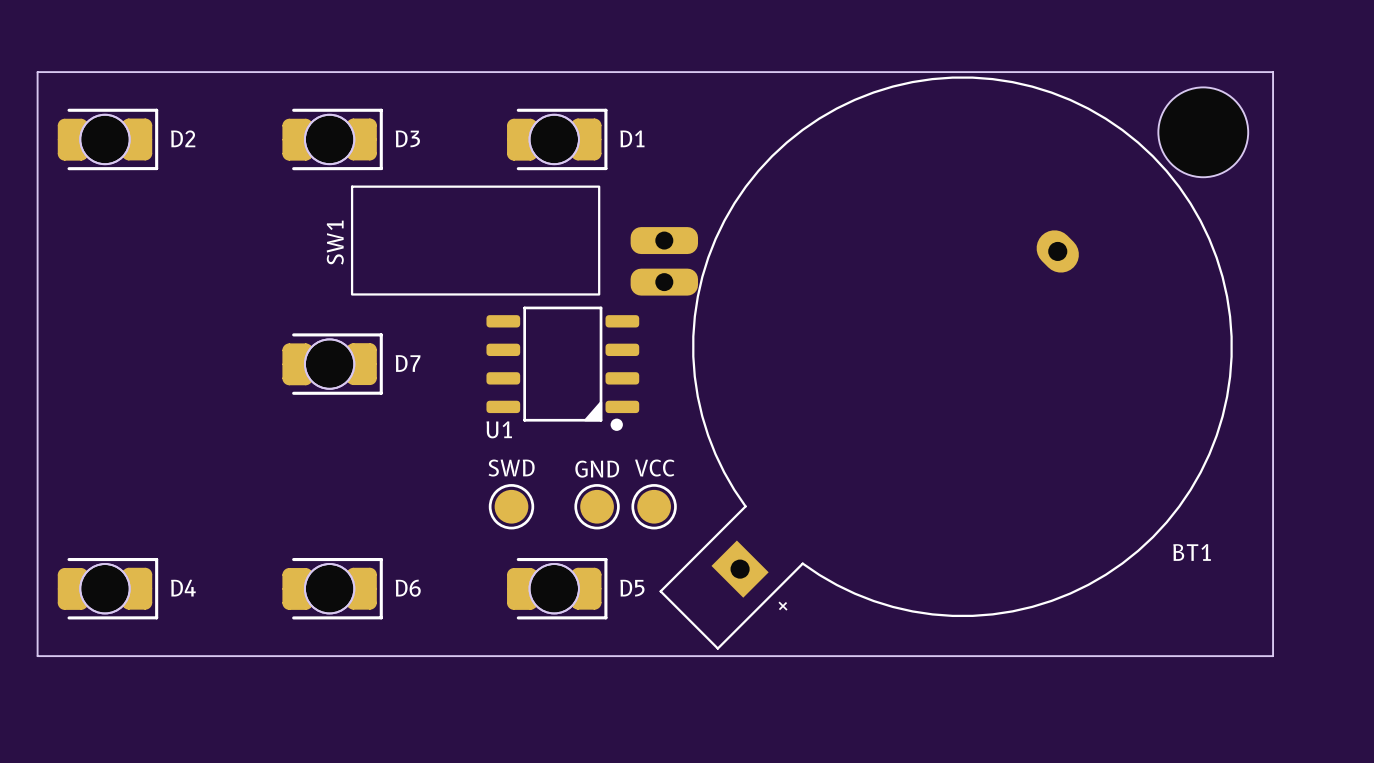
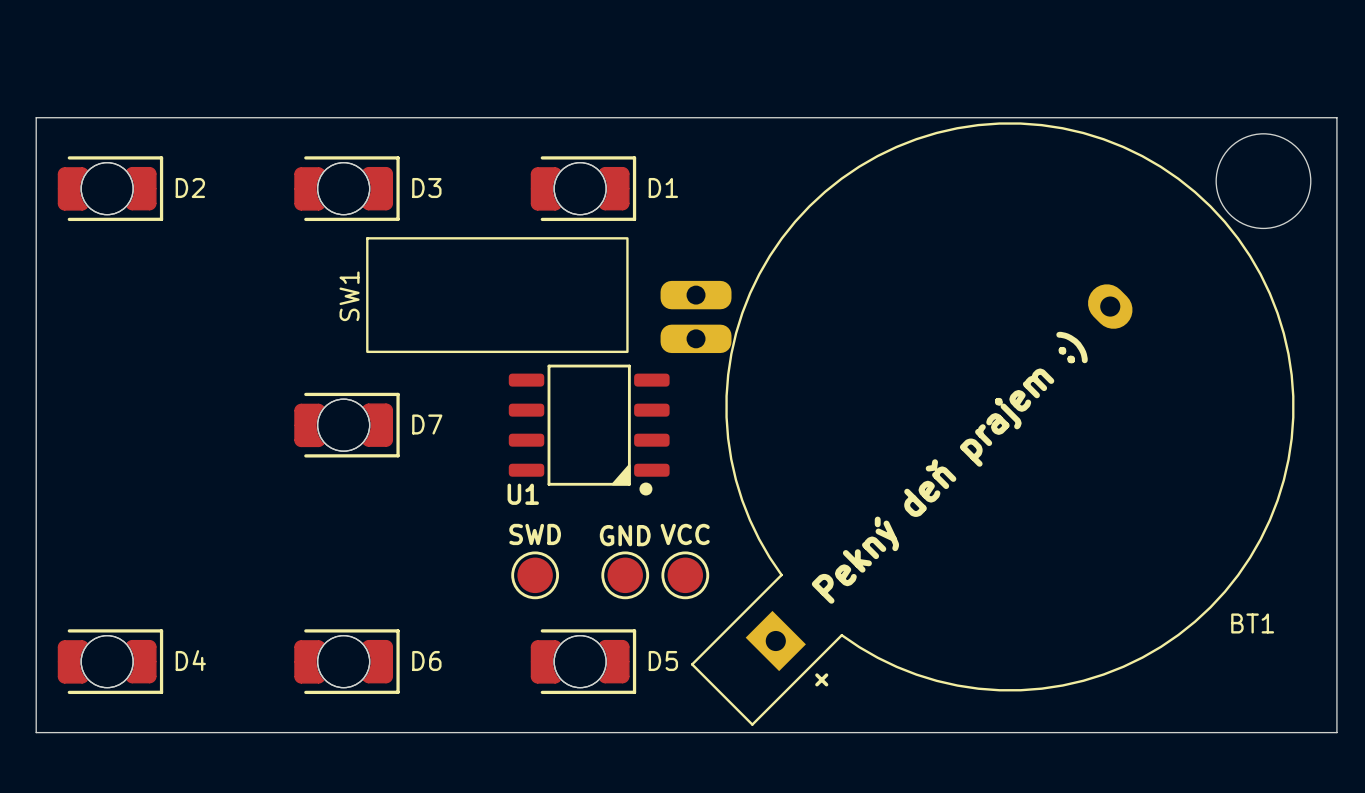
text: none -> Pekný deň prajem :) (949, 467)

